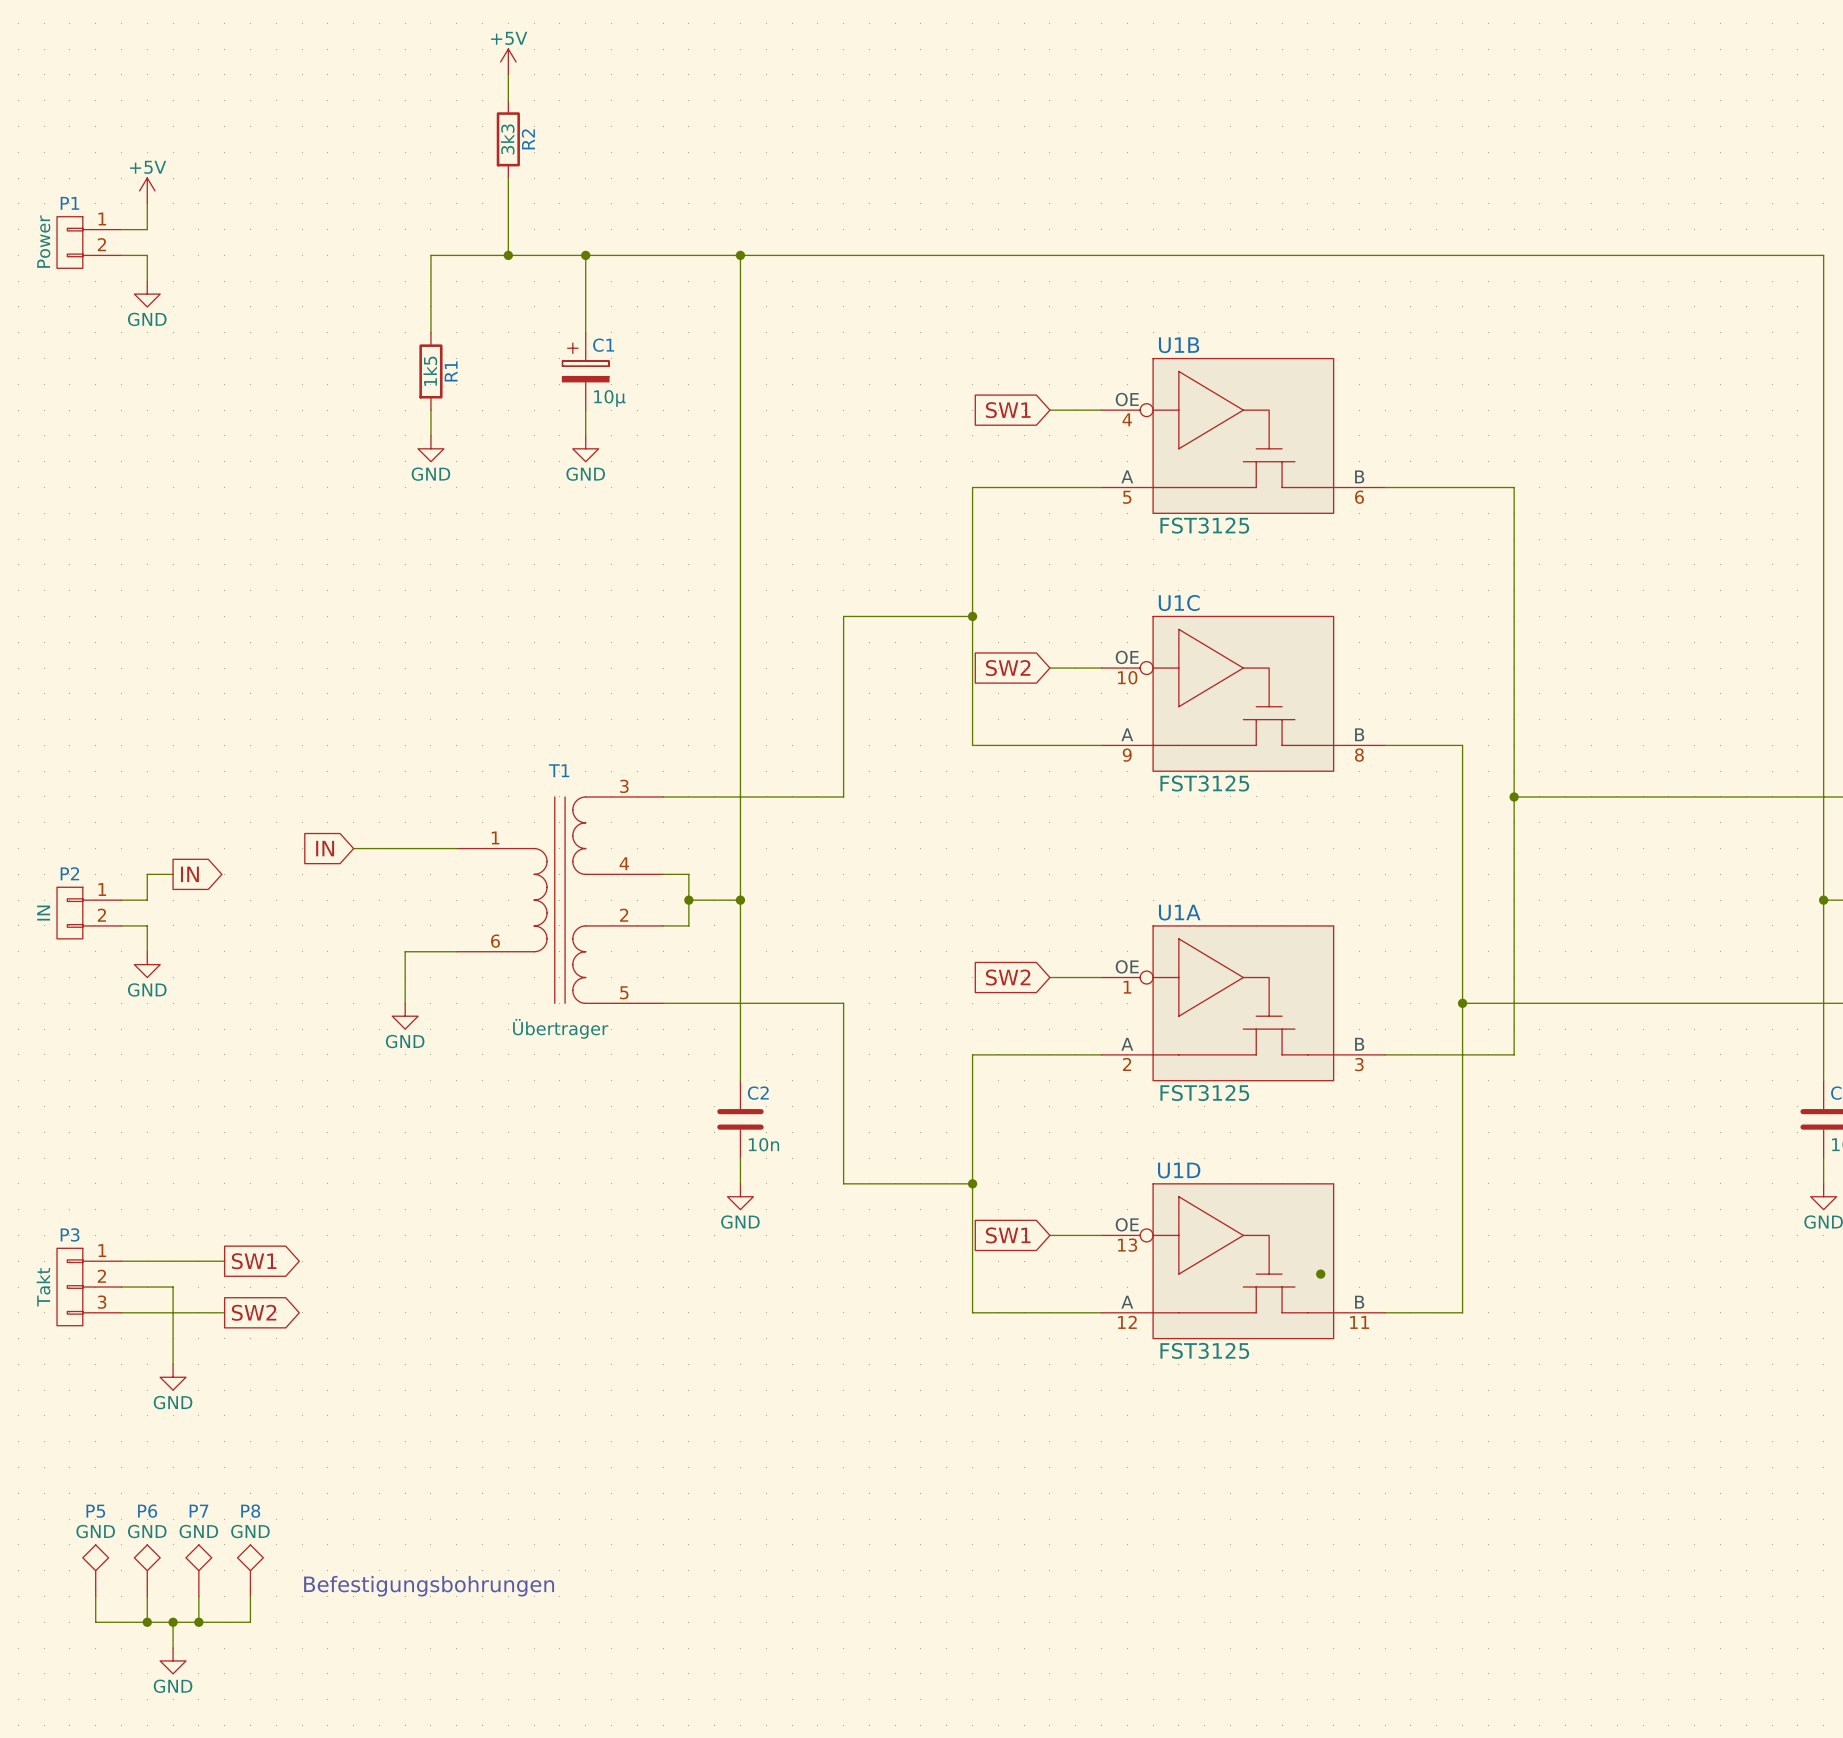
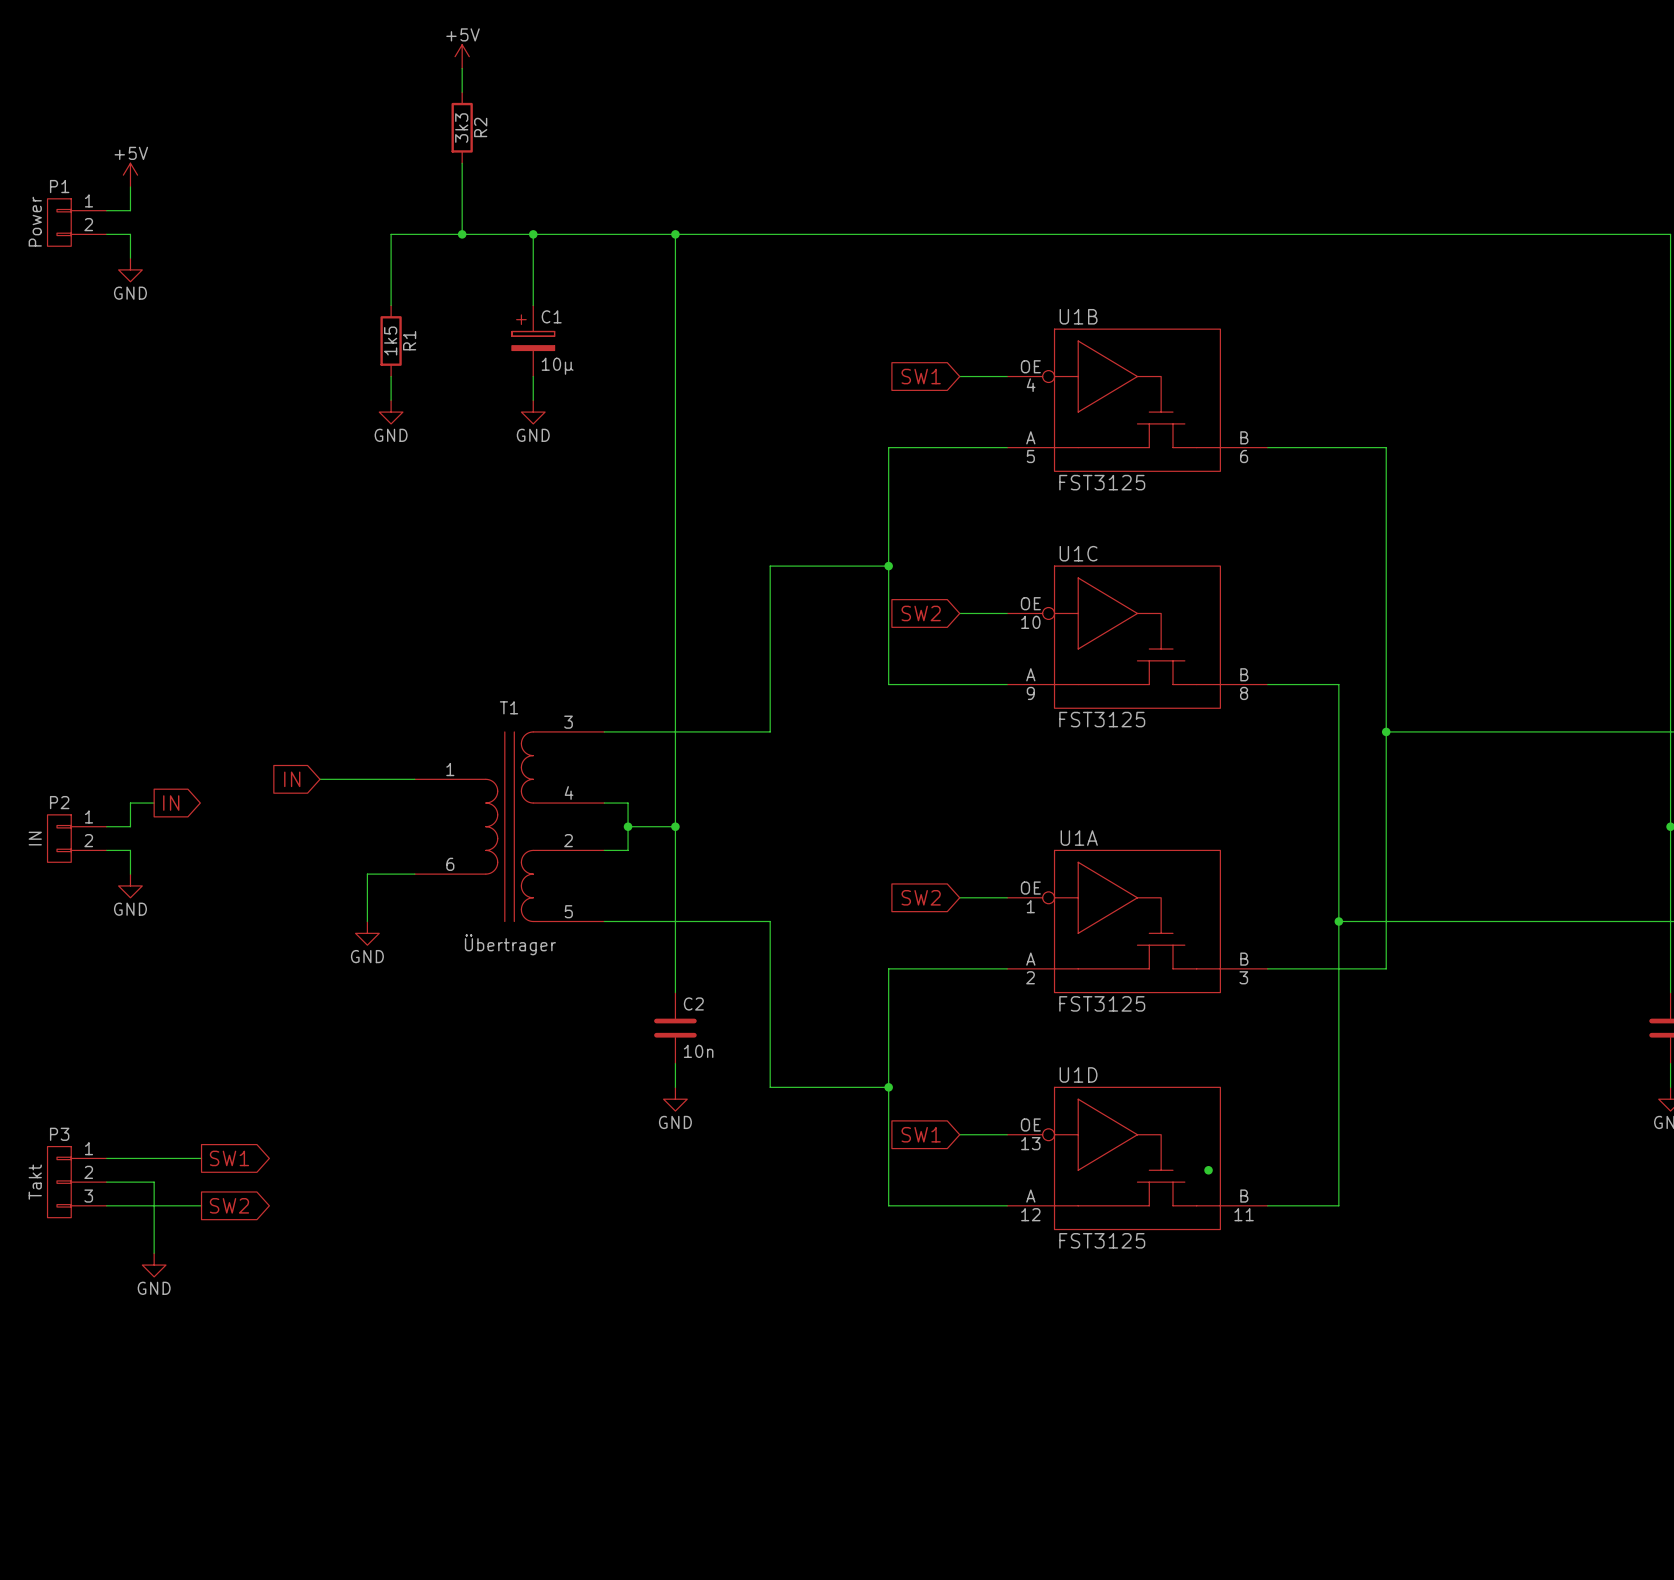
P5: GND (95, 1570) -> none
P6: GND (147, 1570) -> none
P7: GND (198, 1570) -> none
P8: GND (250, 1570) -> none
text: Befestigungsbohrungen (429, 1586) -> none
wire: (95, 1596) (95, 1622) (250, 1622) (250, 1596) -> none
wire: (147, 1596) (147, 1622) -> none
wire: (198, 1596) (198, 1622) -> none
junction: (147, 1622) -> none
wire: (173, 1622) (173, 1648) -> none
junction: (173, 1622) -> none
junction: (198, 1622) -> none
power symbol: GND (173, 1660) -> none

